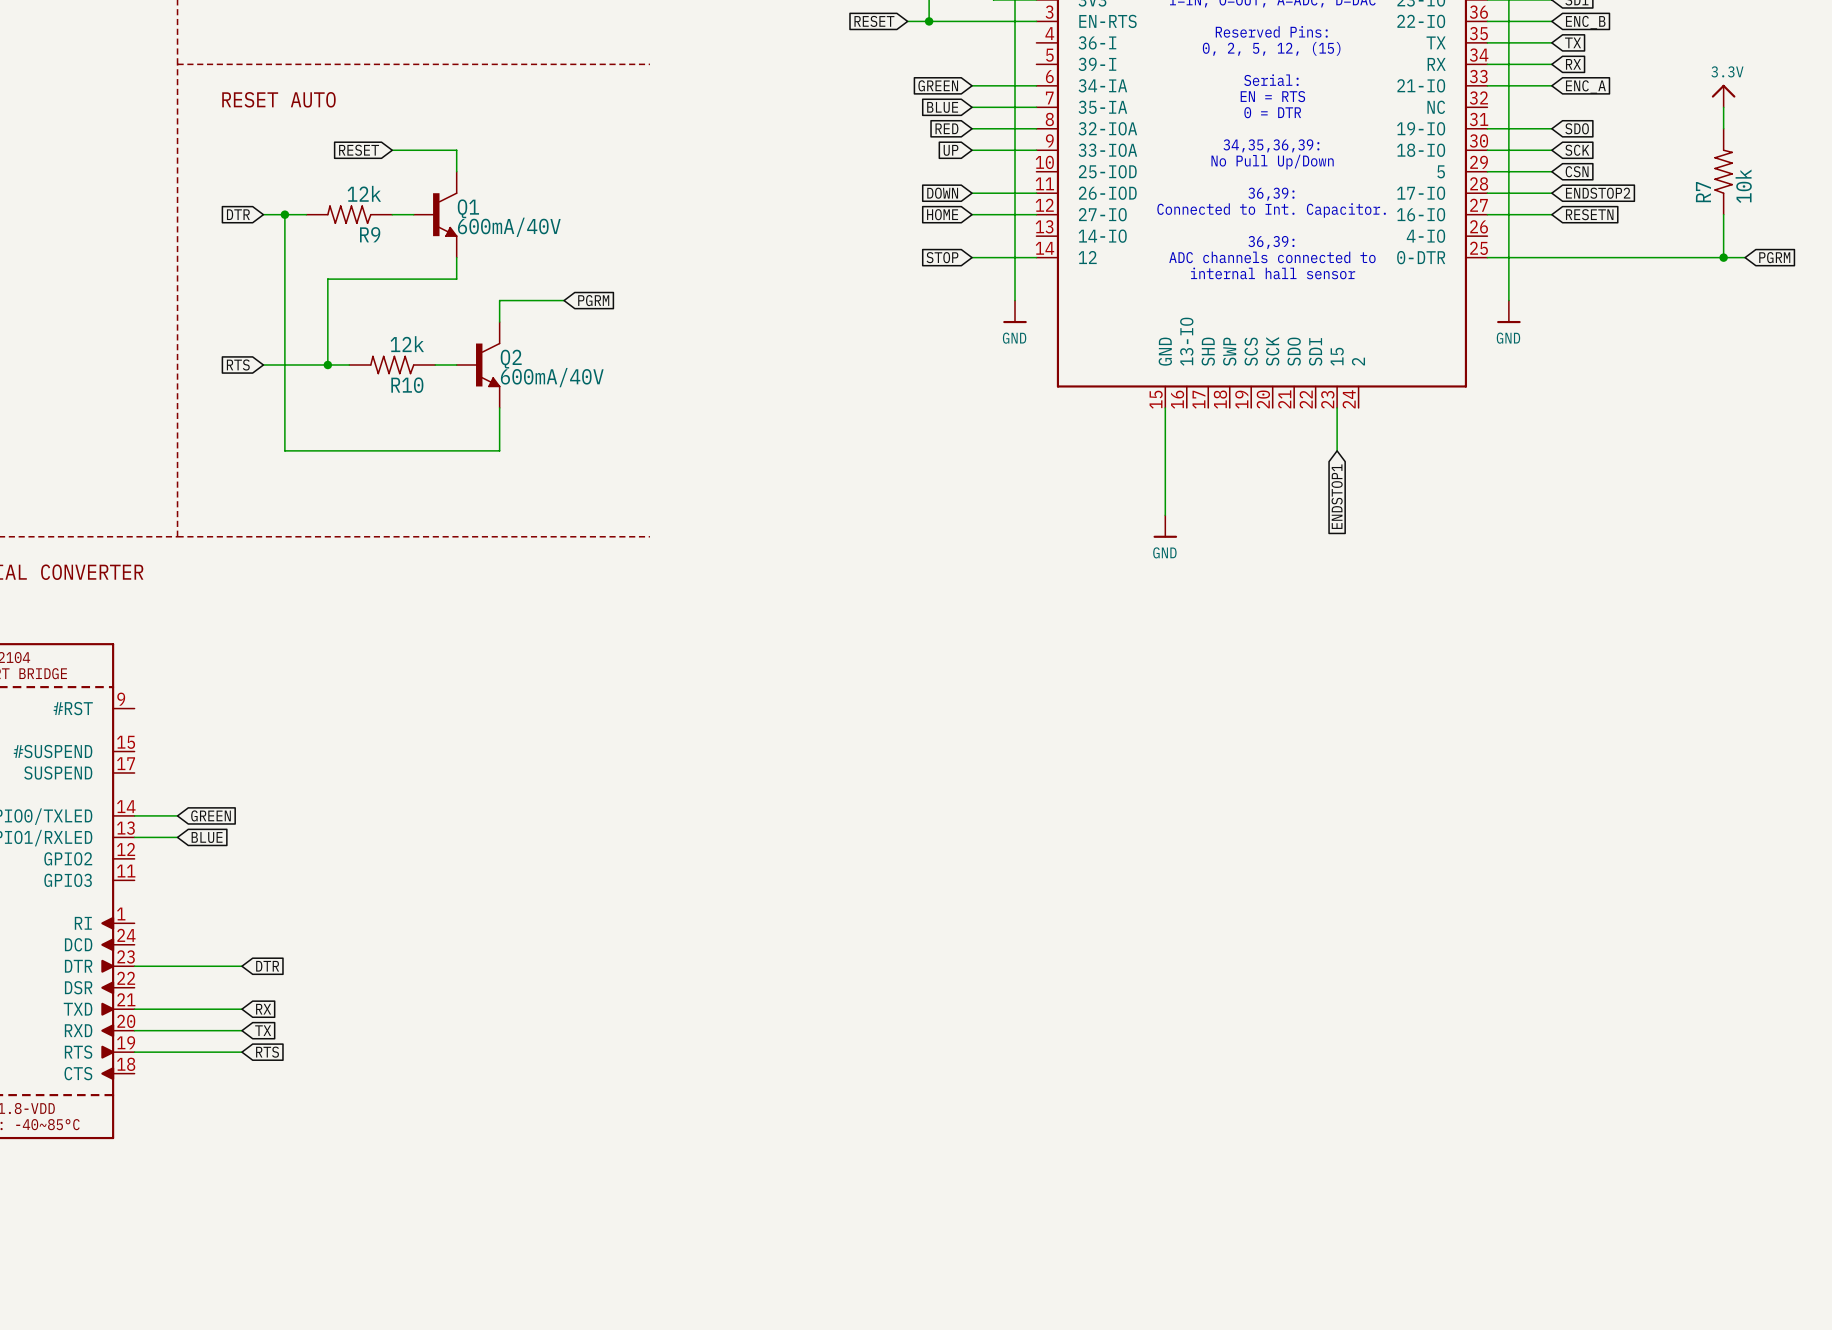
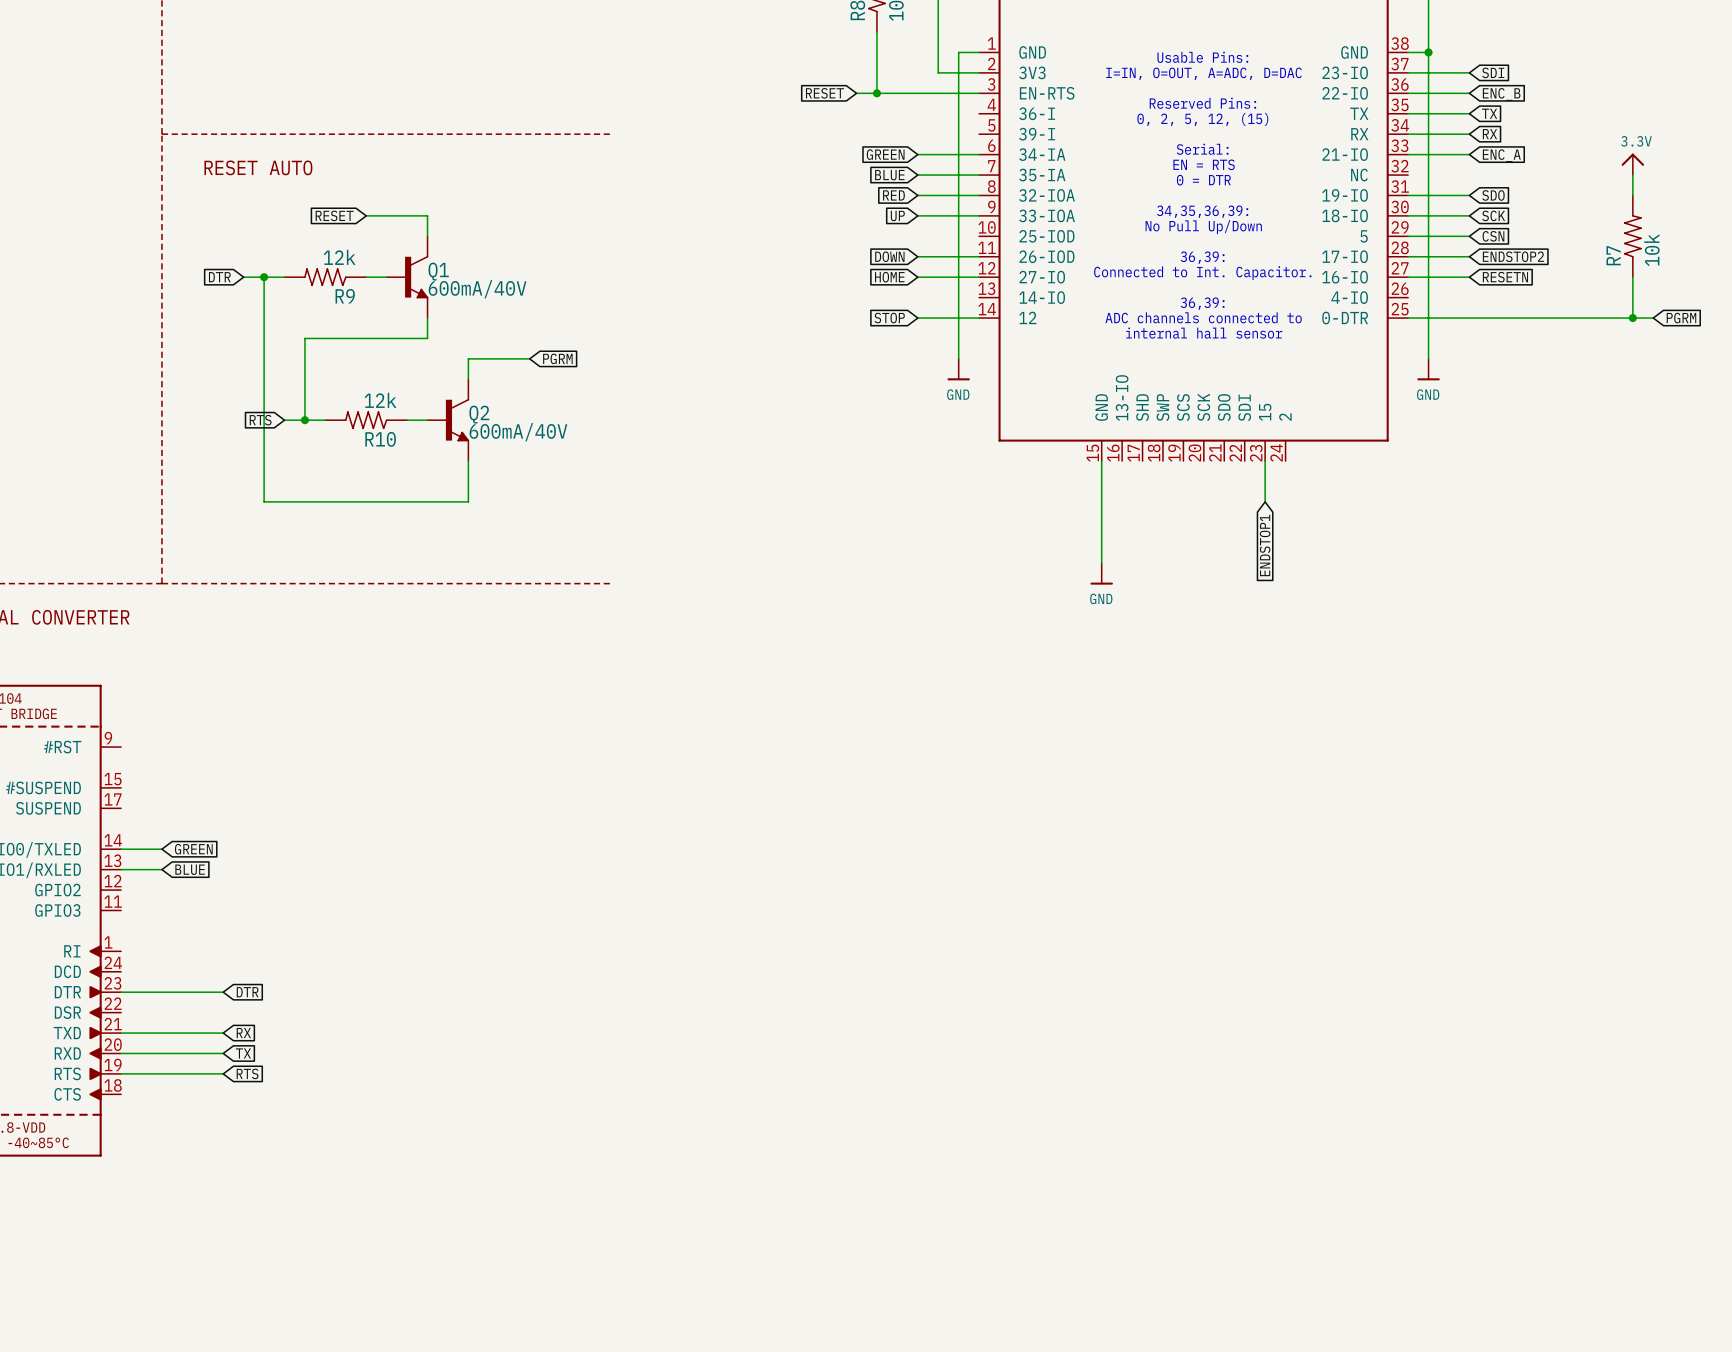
global label position: RTS (238, 364) -> RTS (260, 420)
wire: (263, 364) (306, 364) -> none

